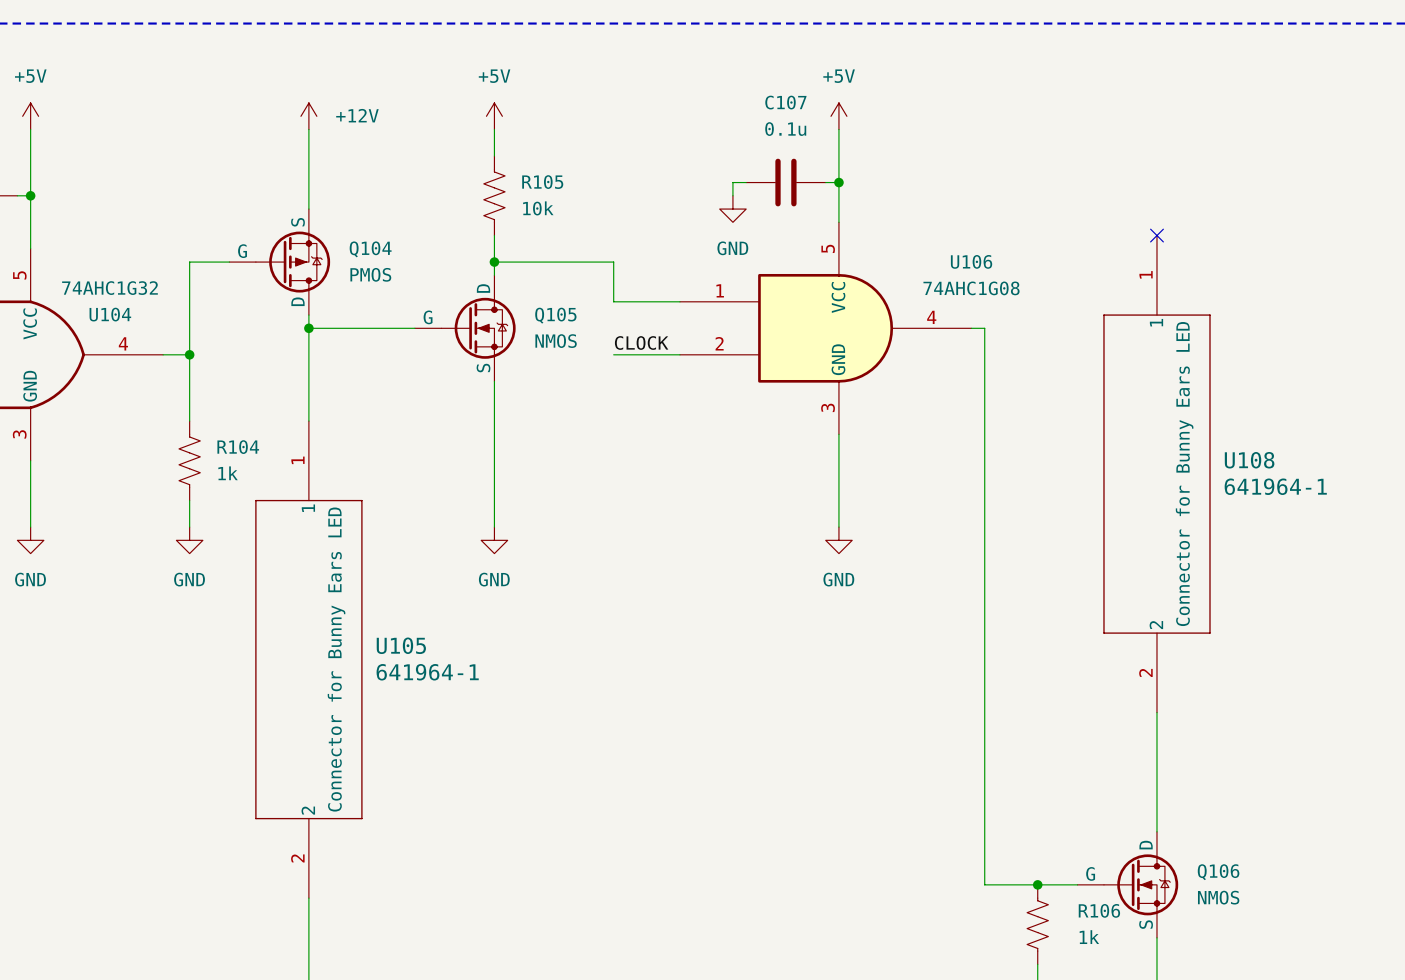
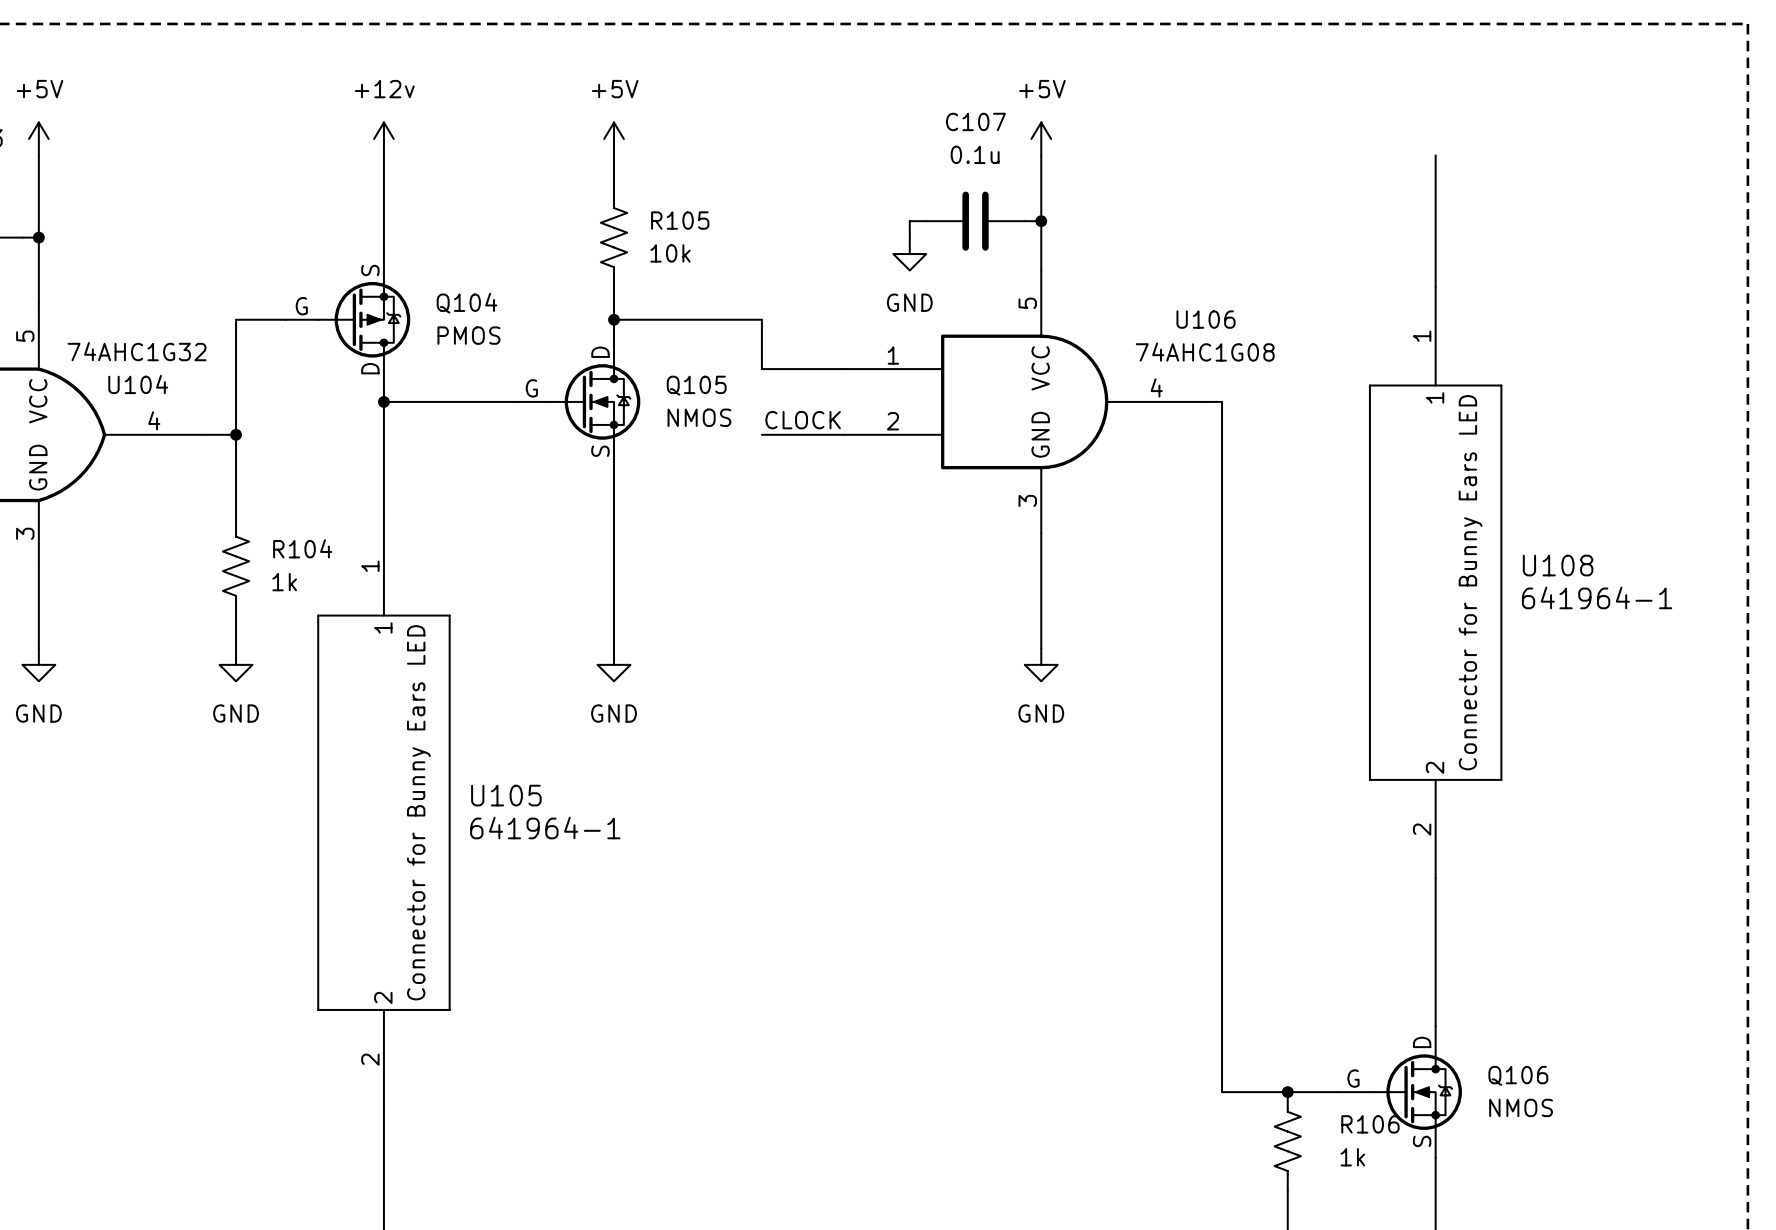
power symbol: +12V (308, 116) -> +12v (383, 139)
wire: none -> (1435, 155) (1435, 286)
no-connect mark: (1156, 235) -> none

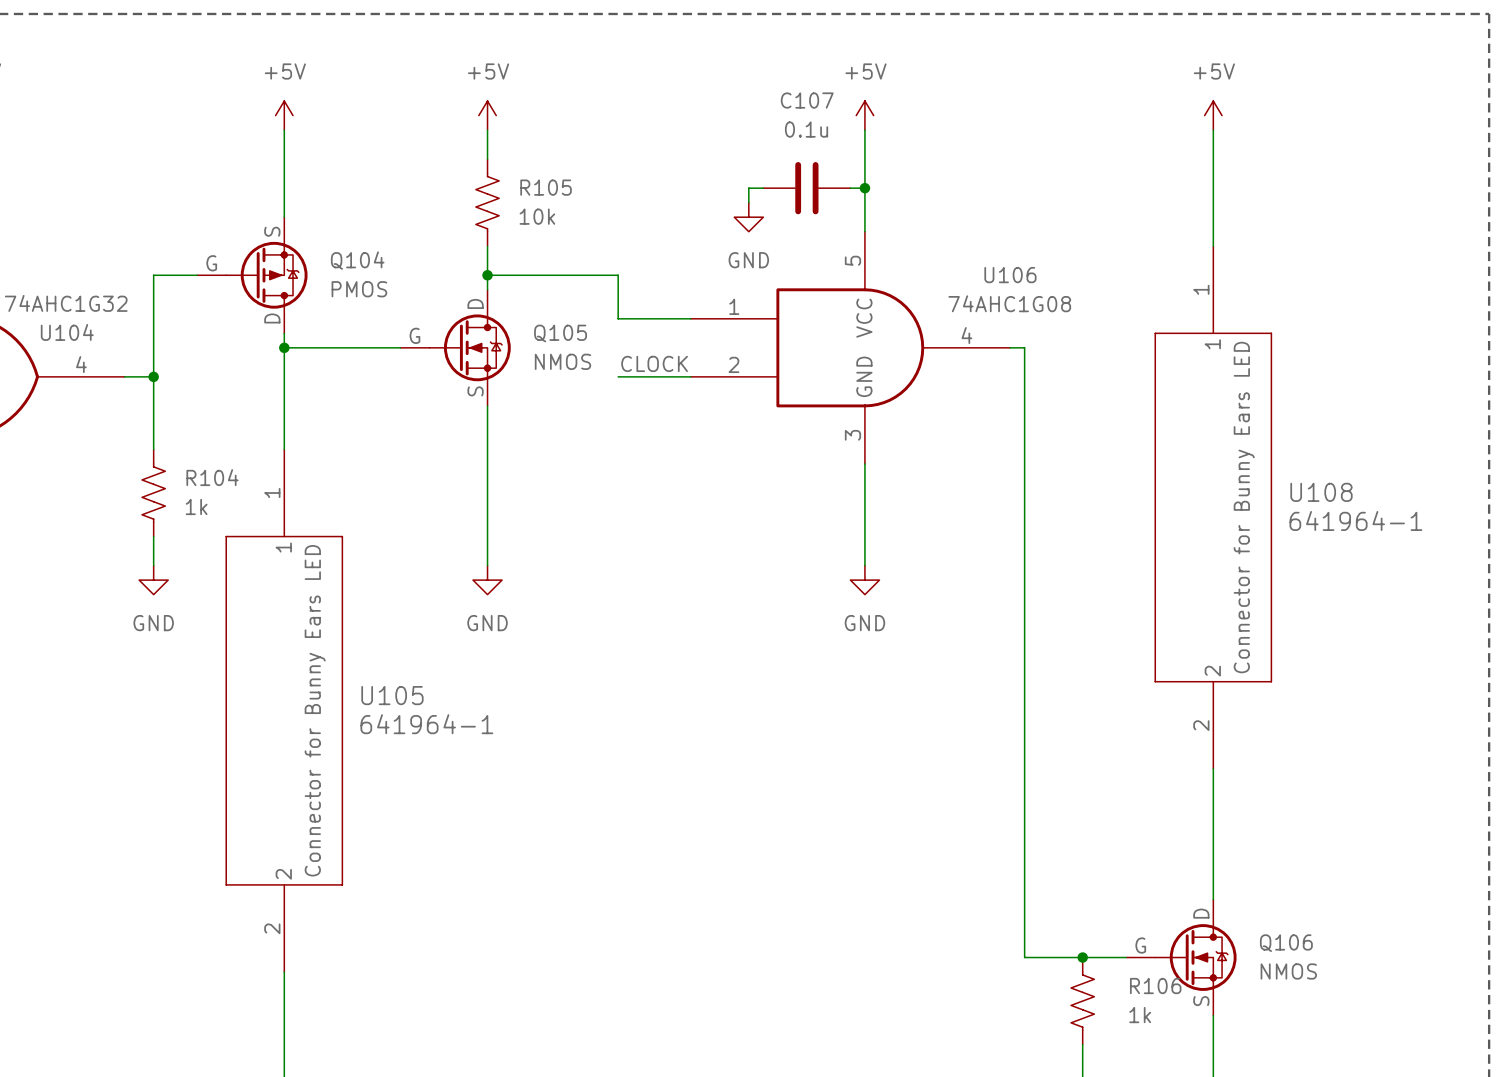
power symbol: +12v (383, 139) -> +5V (284, 115)
power symbol: none -> +5V (1213, 115)

